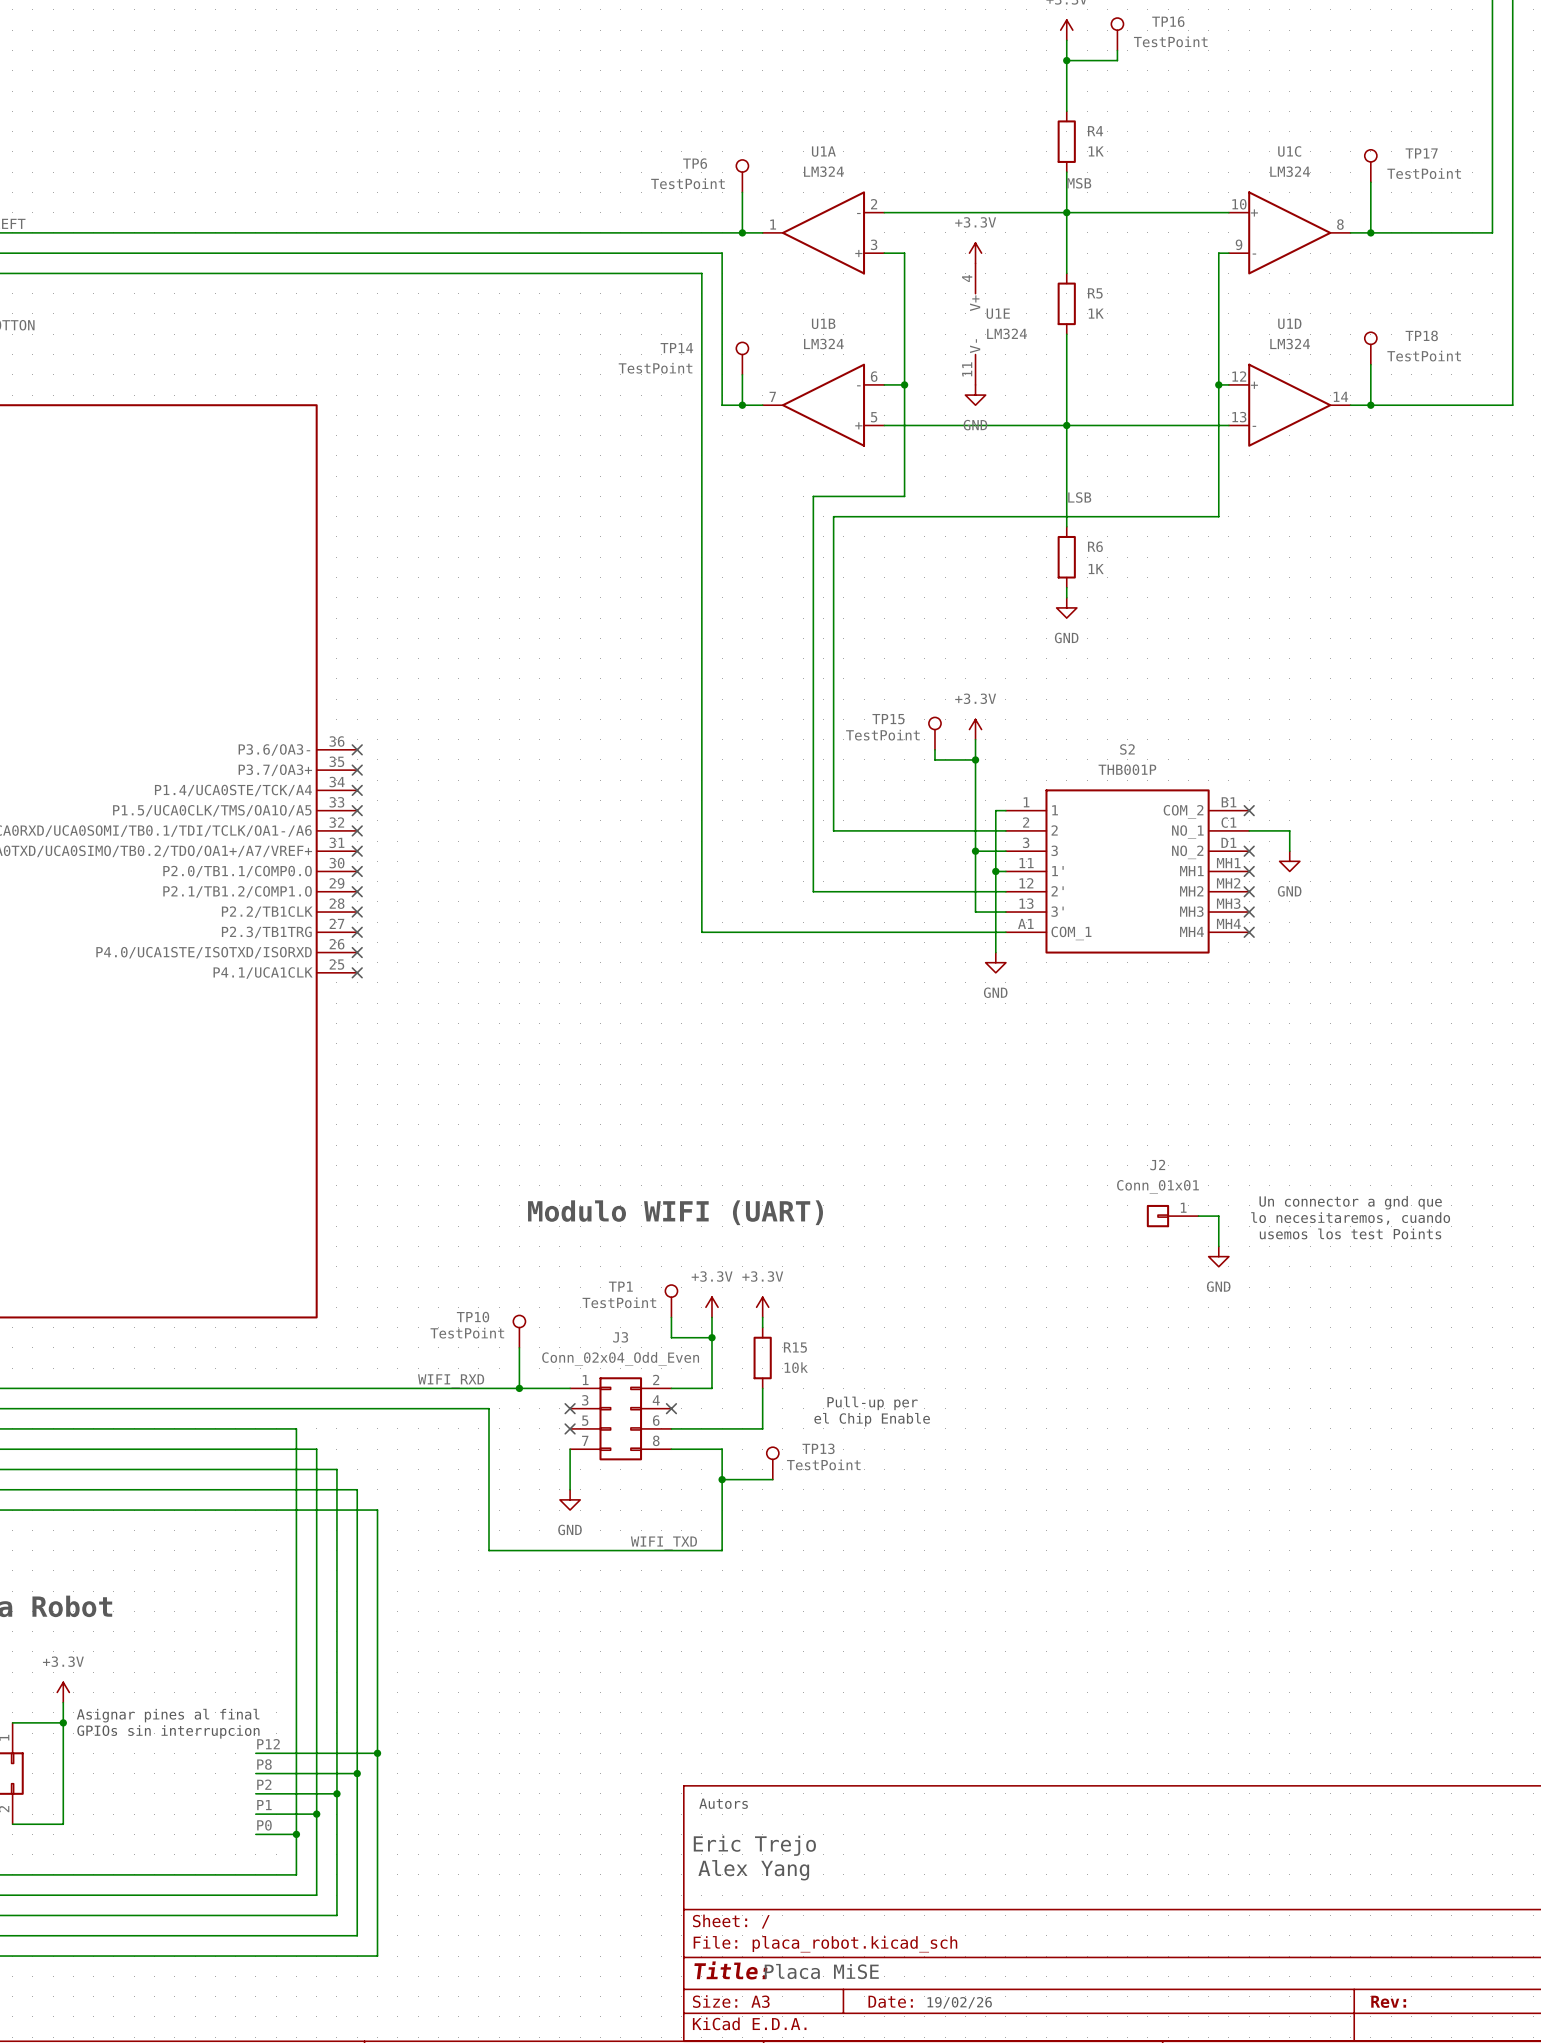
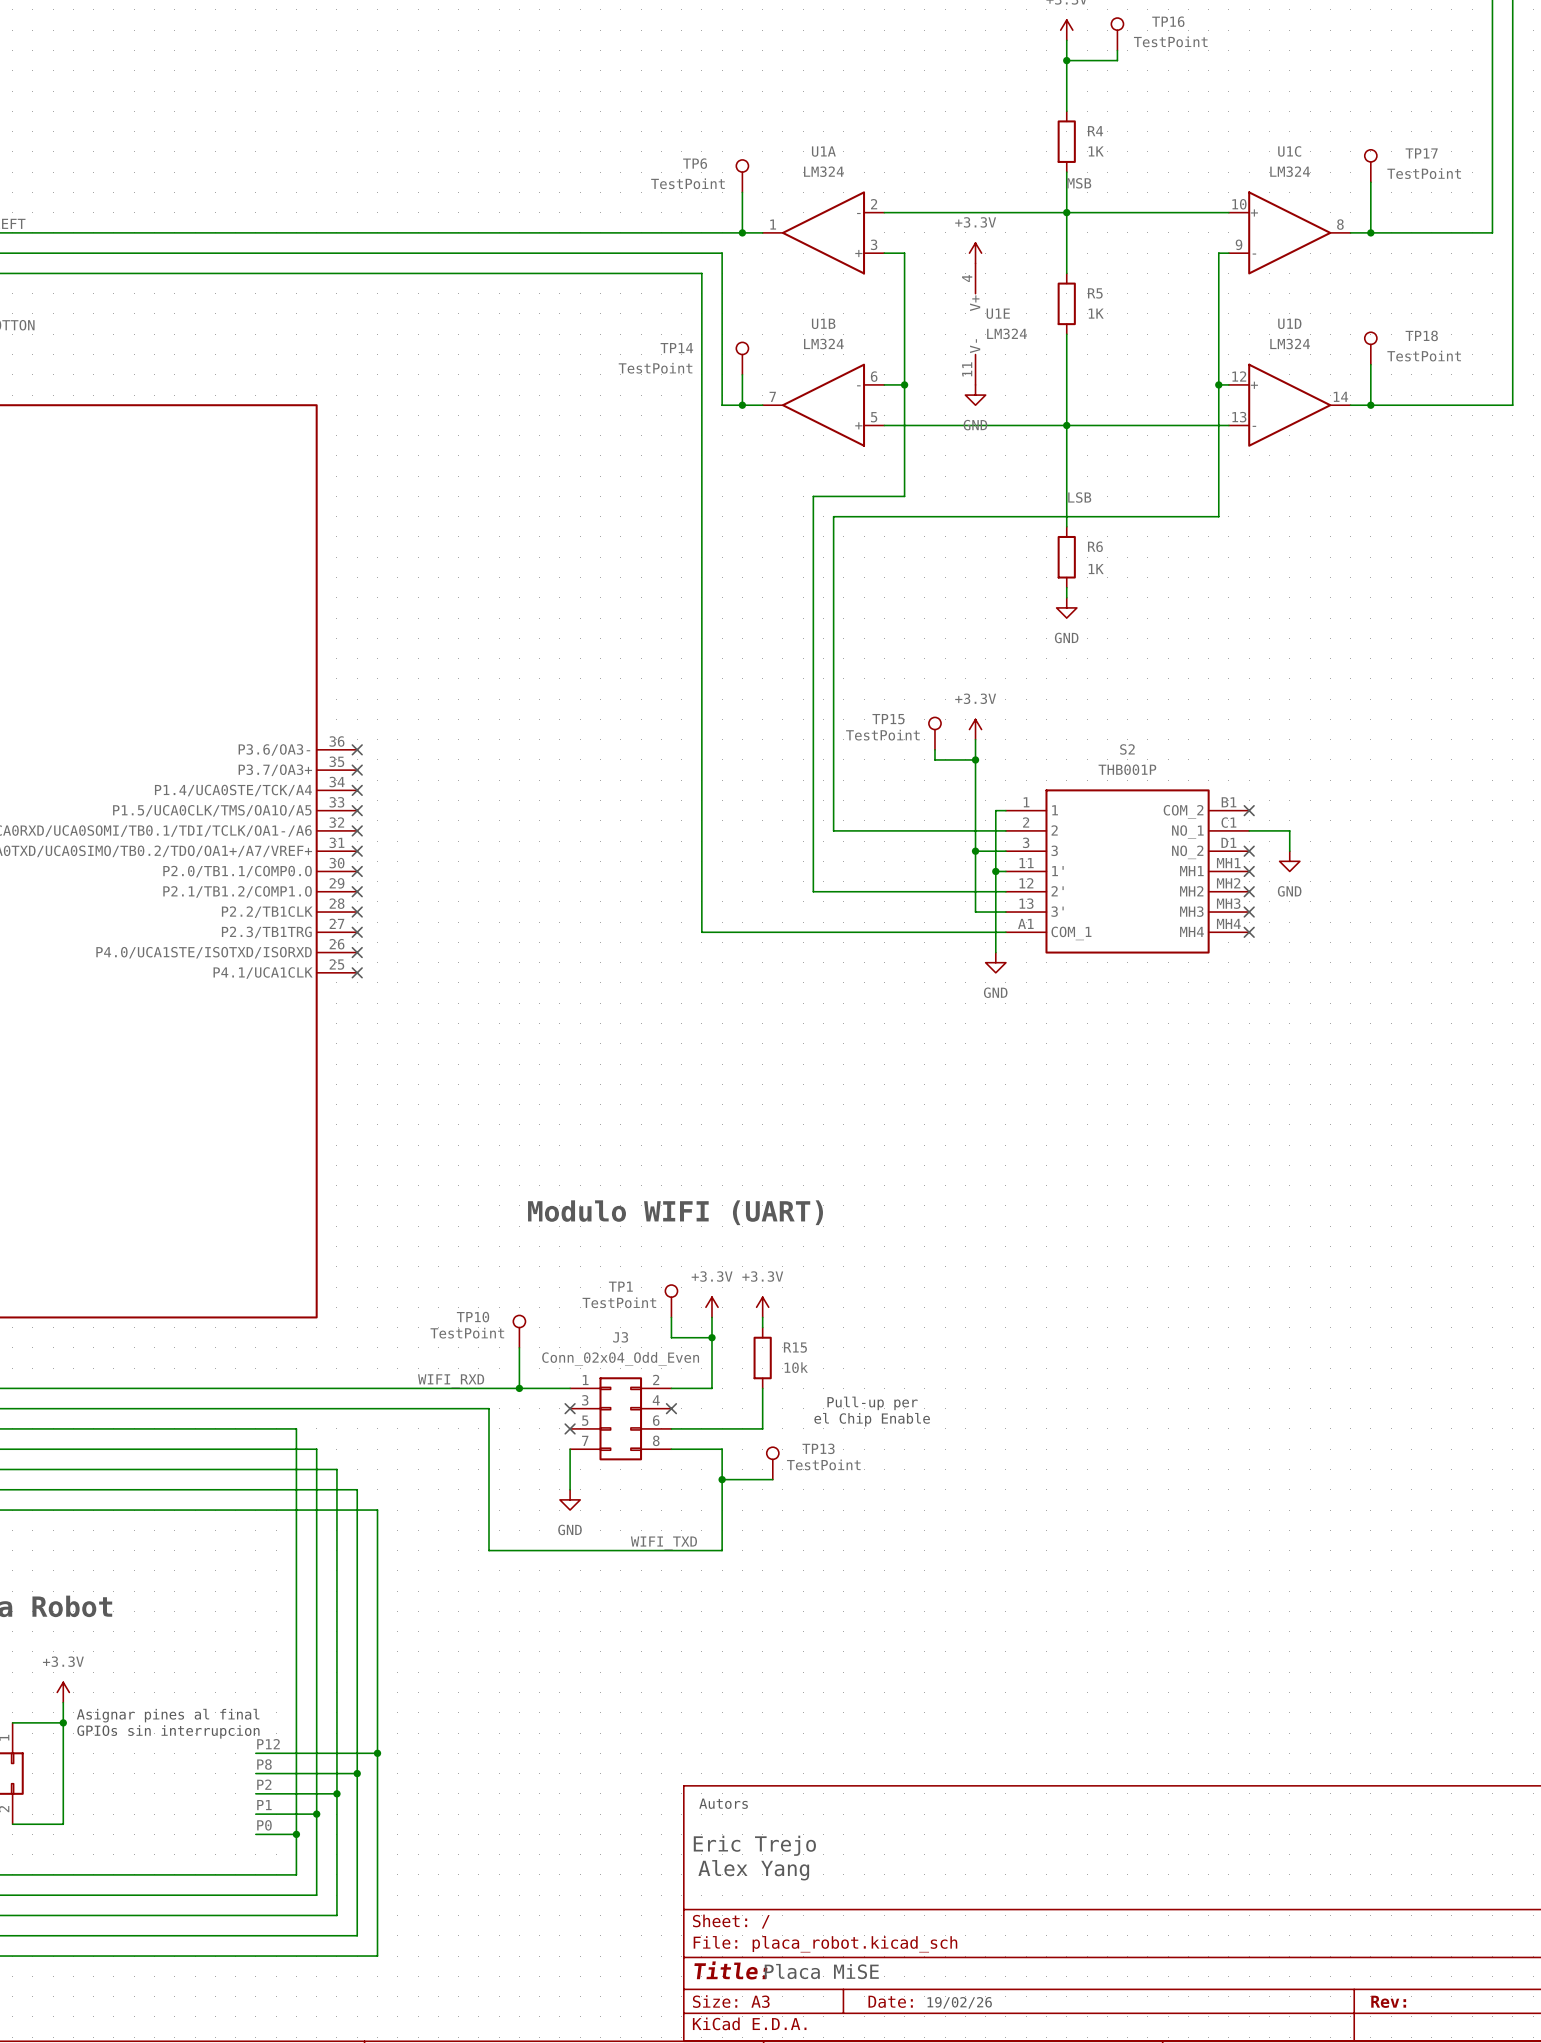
text: Un connector a gnd que (1350, 1202) -> none
J2: Conn_01x01 (1172, 1216) -> none
wire: (1198, 1216) (1218, 1216) (1218, 1246) -> none
text: lo necesitaremos, cuando (1350, 1218) -> none
text: usemos los test Points (1350, 1233) -> none
power symbol: GND (1218, 1256) -> none

